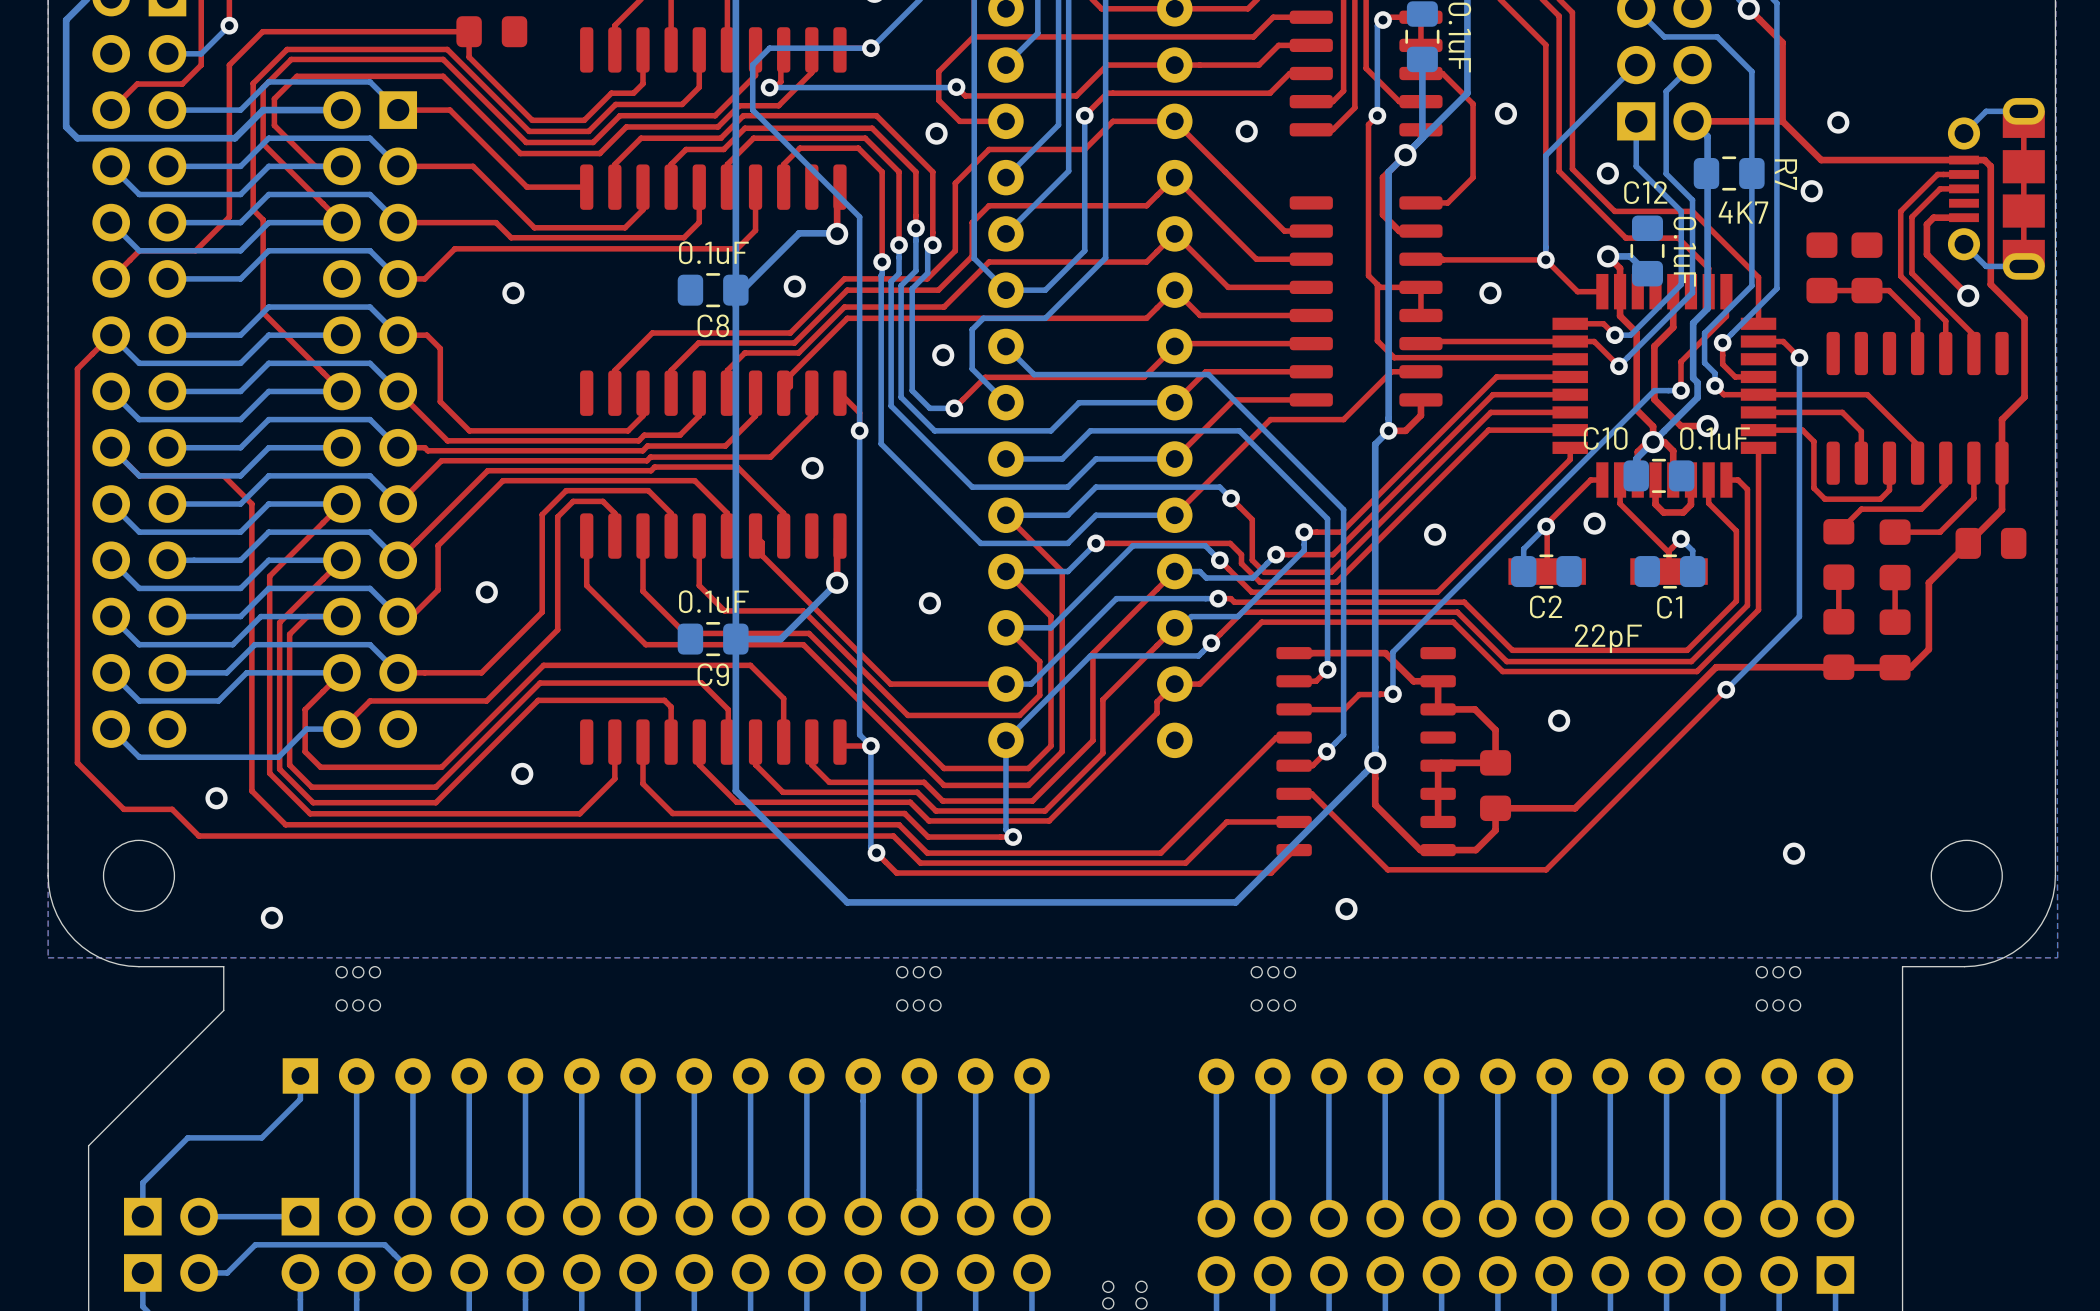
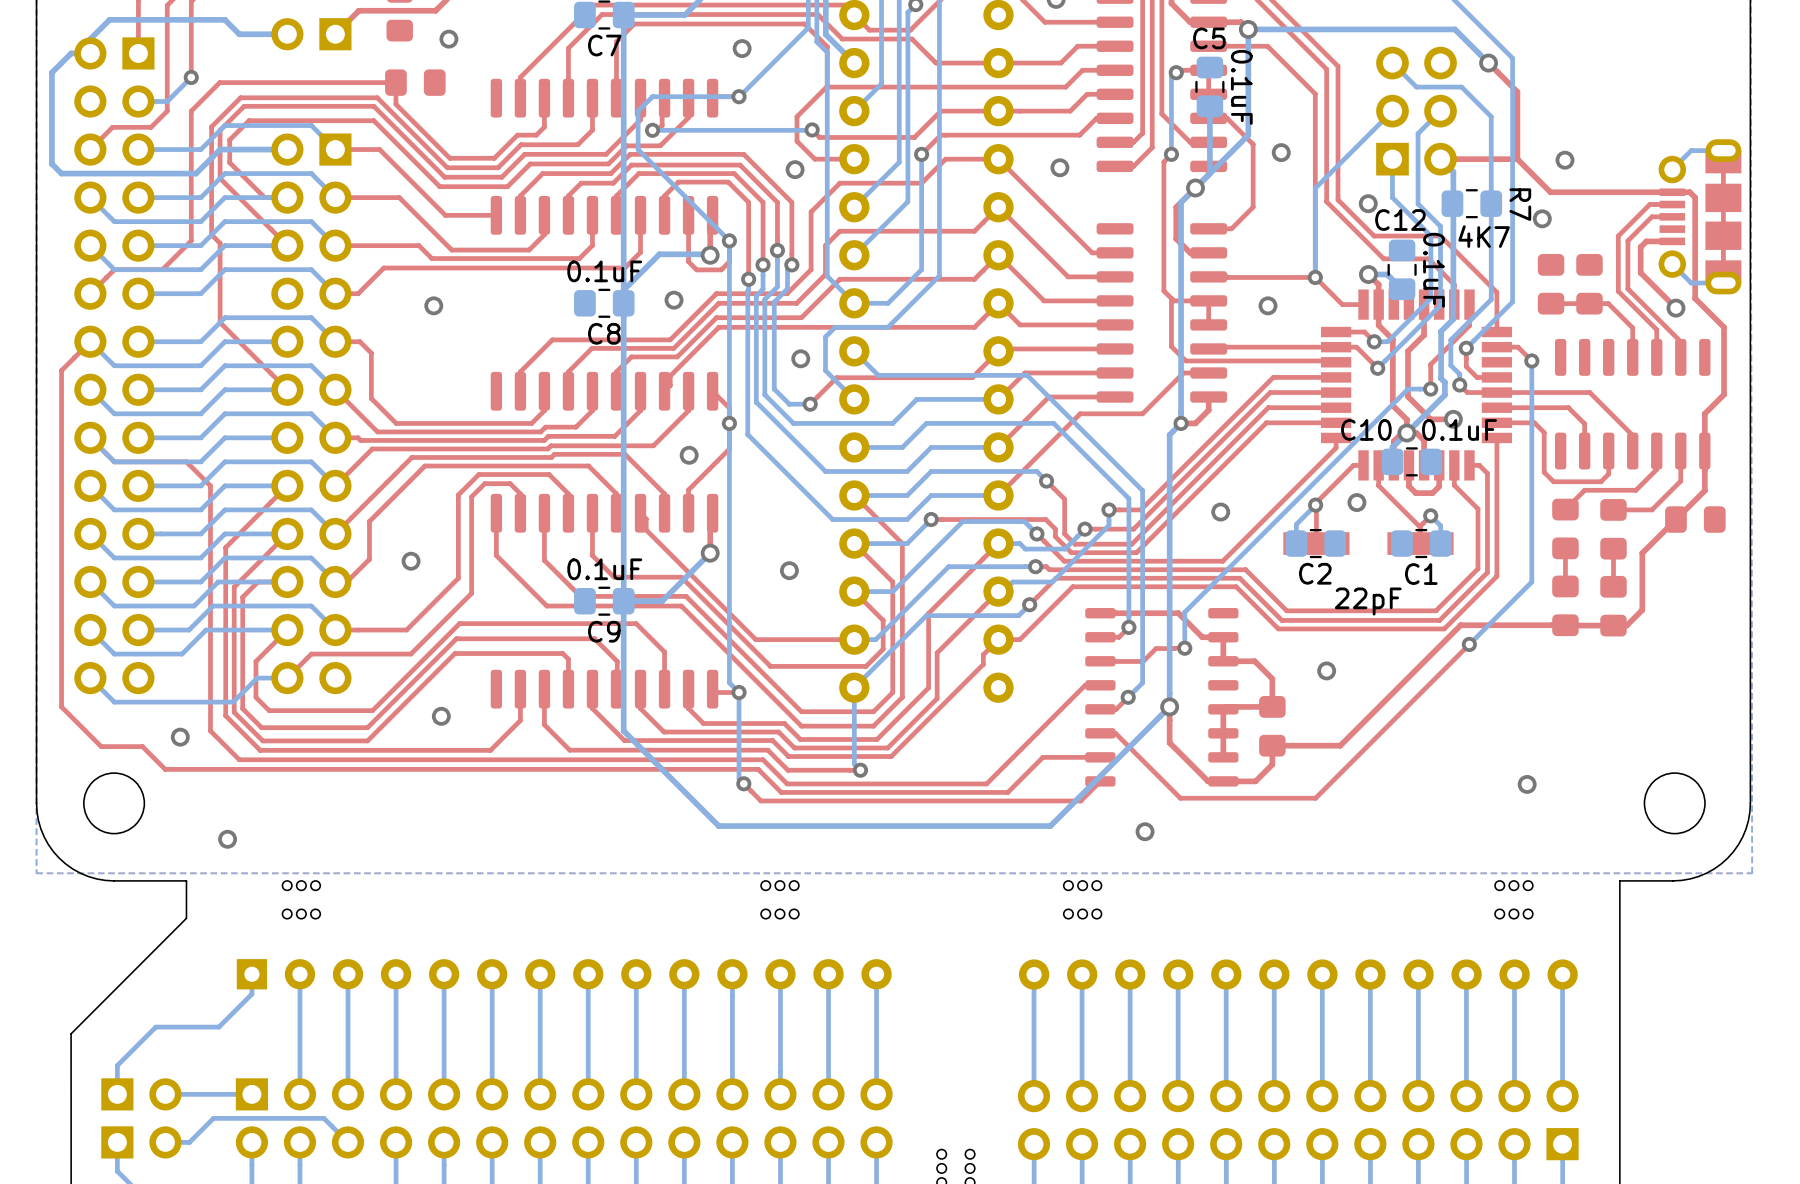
top track: none -> (688, 215) (688, 261) (696, 269) (721, 269) (729, 261) (729, 240)
via: none -> (729, 240)
bottom track: none -> (710, 254) (659, 254) (623, 290)
bottom track: (837, 233) (799, 233) (742, 290) (735, 290) -> none
top track: none -> (729, 423) (729, 449) (688, 489) (688, 513)

